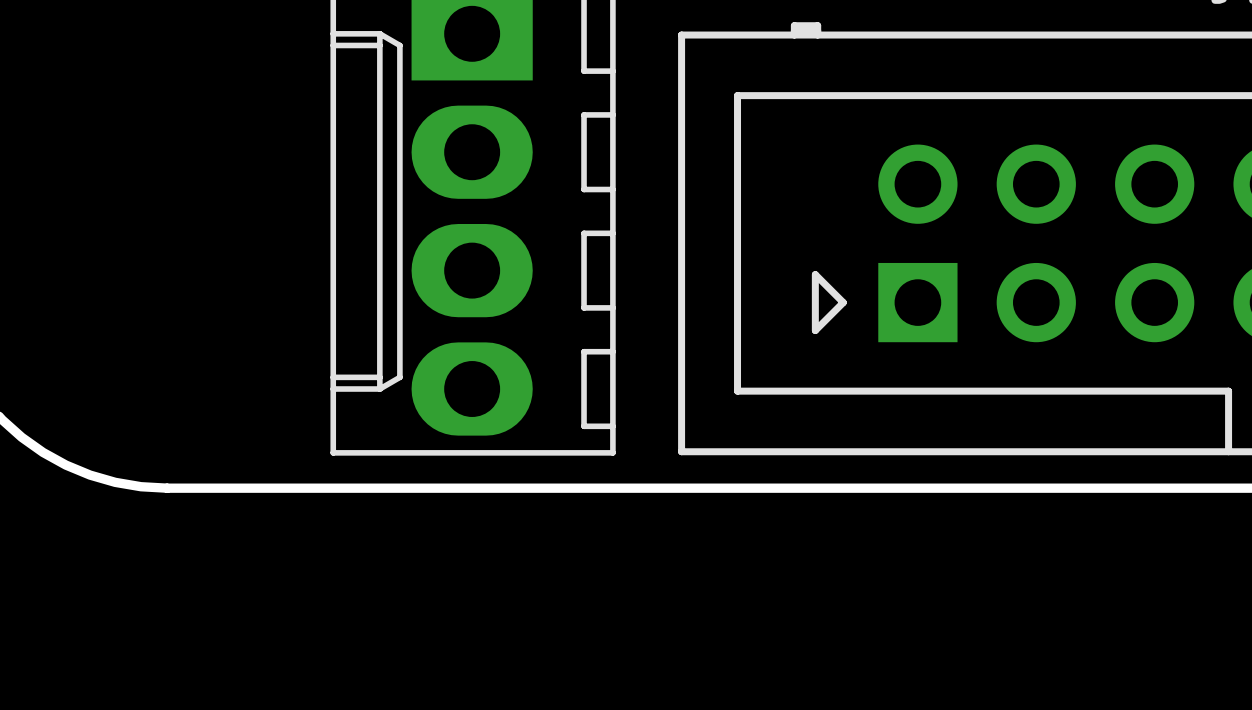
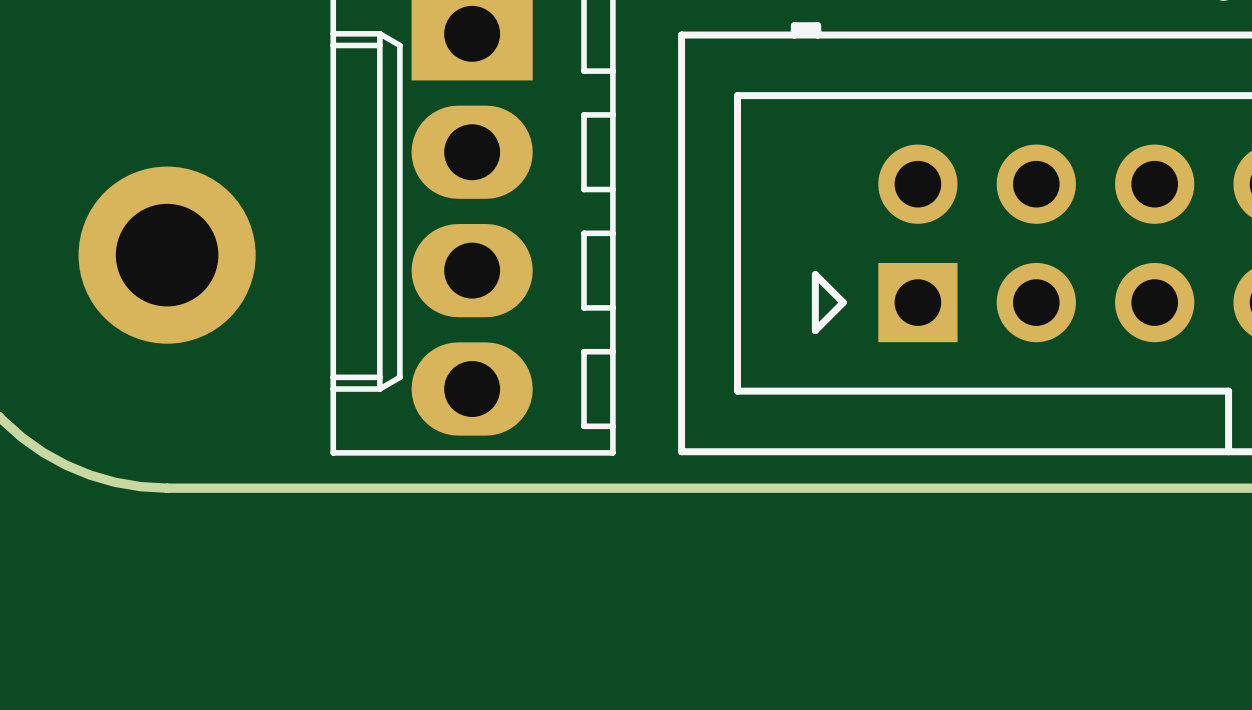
part: none -> (167, 255)

